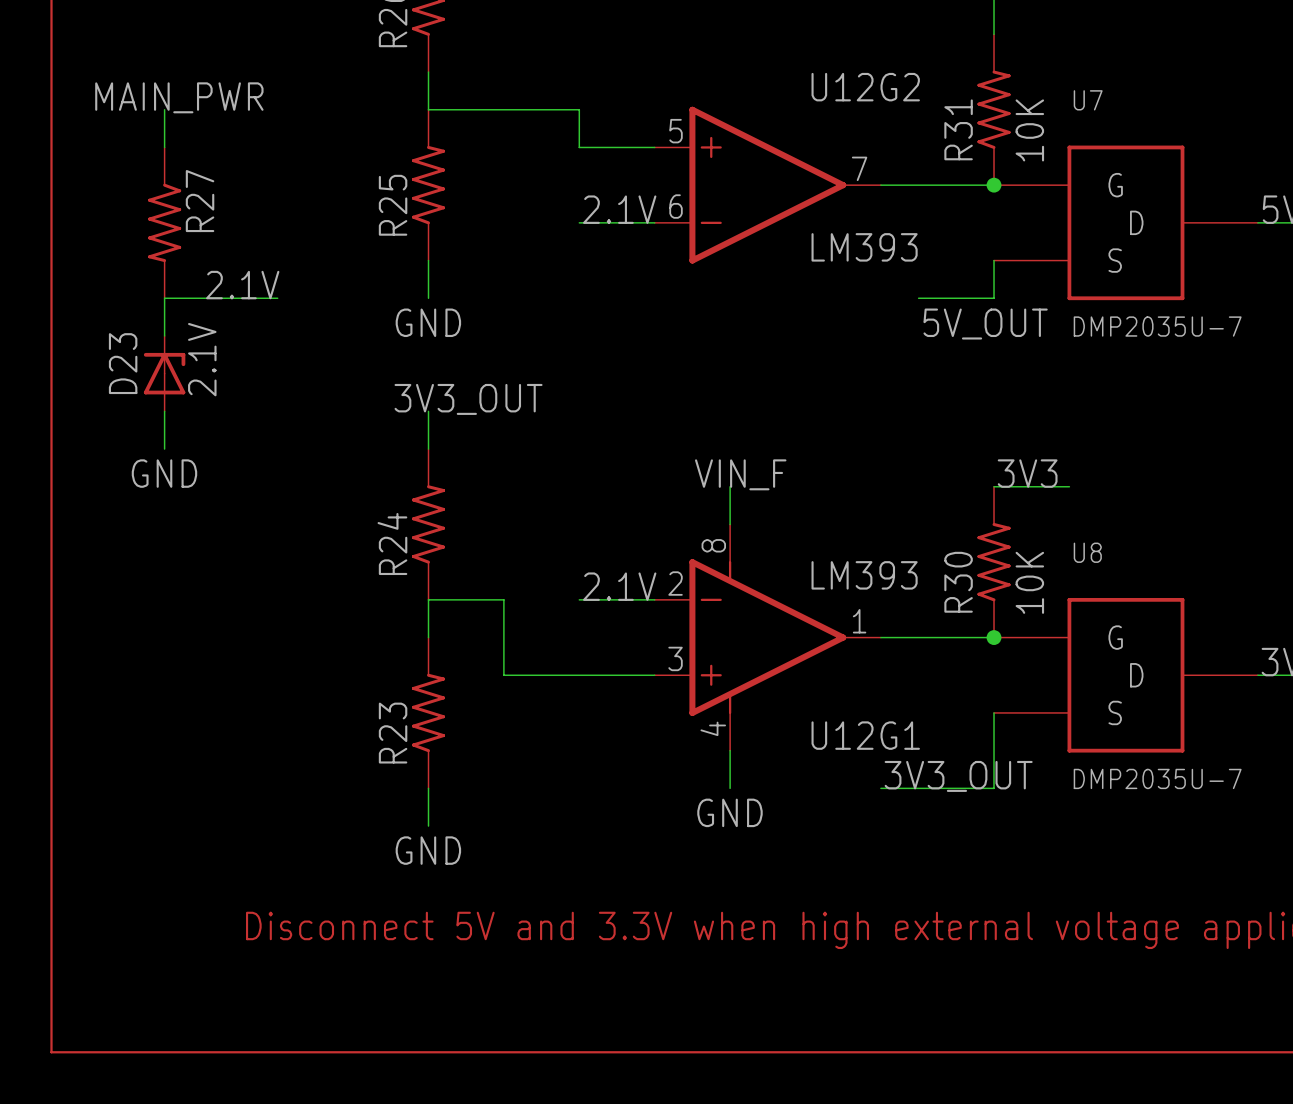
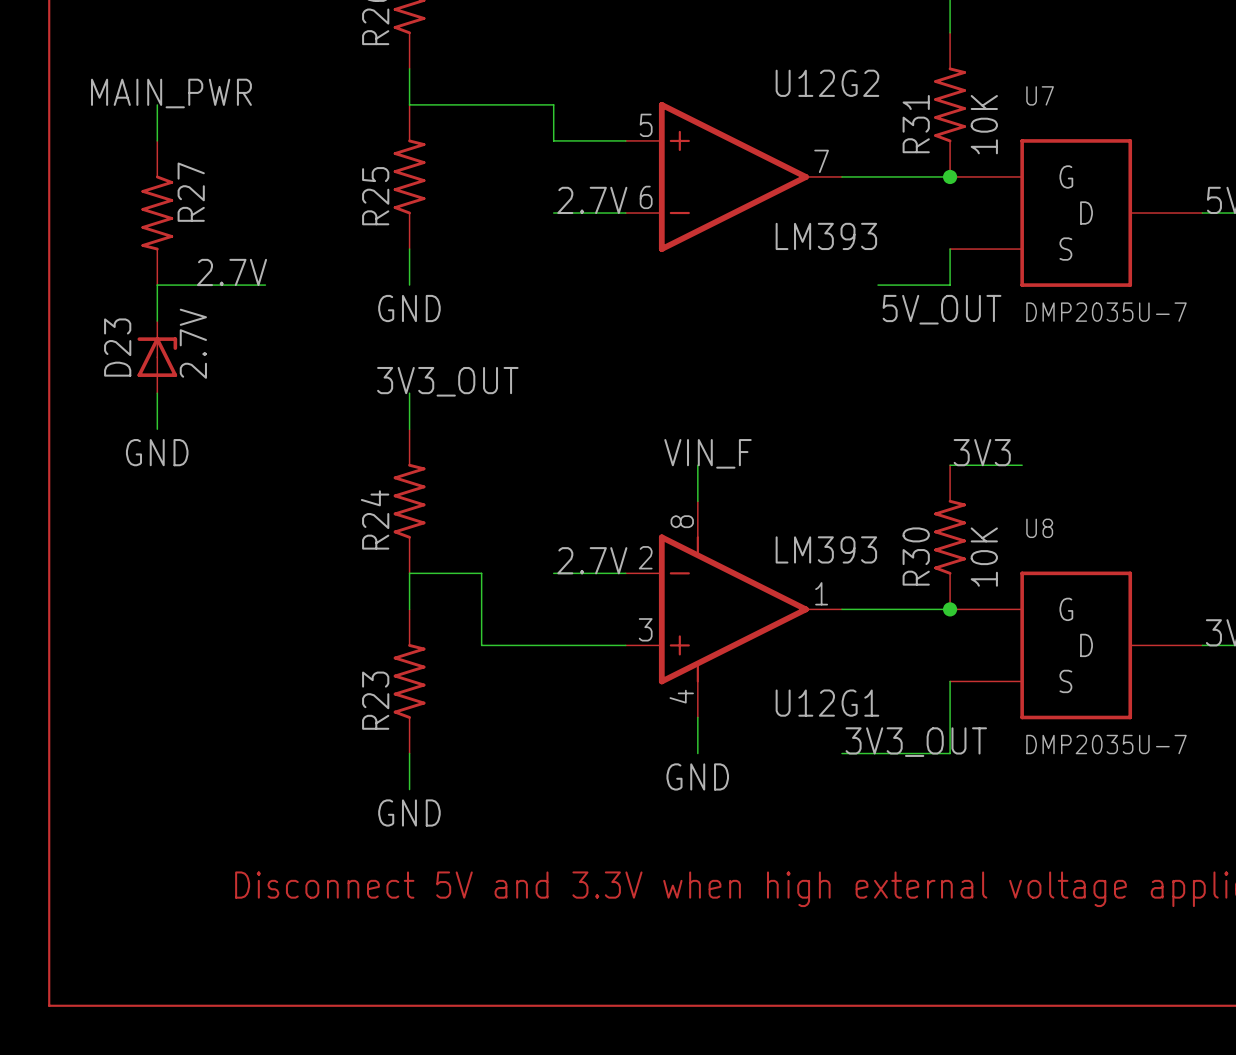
label: 2.1V (619, 209) -> 2.7V (592, 200)
label: 2.1V (242, 285) -> 2.7V (231, 272)
D23 value: 2.1V (202, 359) -> 2.7V (193, 343)
label: 2.1V (619, 586) -> 2.7V (592, 560)

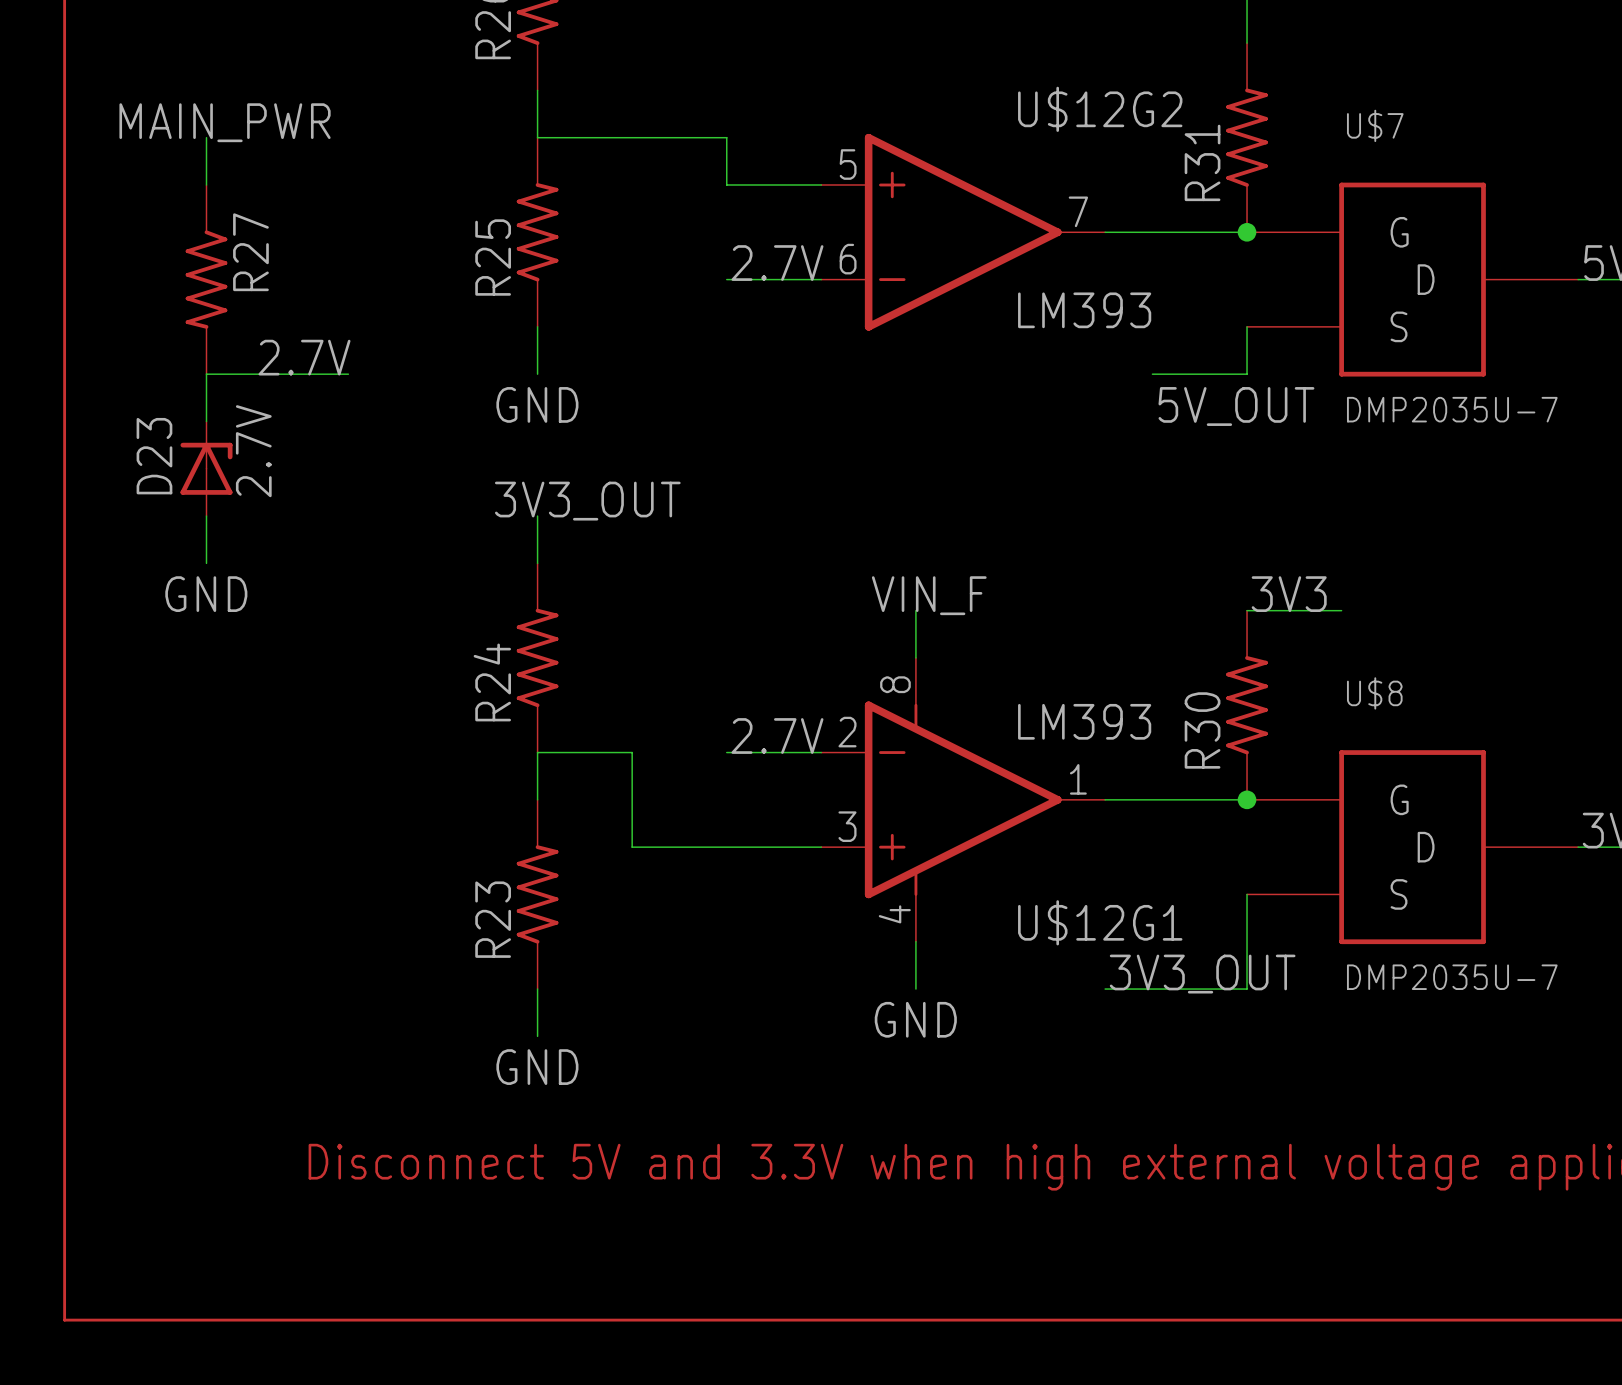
U12G2 name: U12G2 (827, 83) -> U$12G2 (1100, 109)
U7 name: U7 (1040, 95) -> U$7 (1375, 125)
R31 value: 10K (984, 124) -> none
U8 name: U8 (1039, 528) -> U$8 (1374, 693)
R30 value: 10K (984, 557) -> none
U12G1 name: U12G1 (827, 703) -> U$12G1 (1100, 922)

